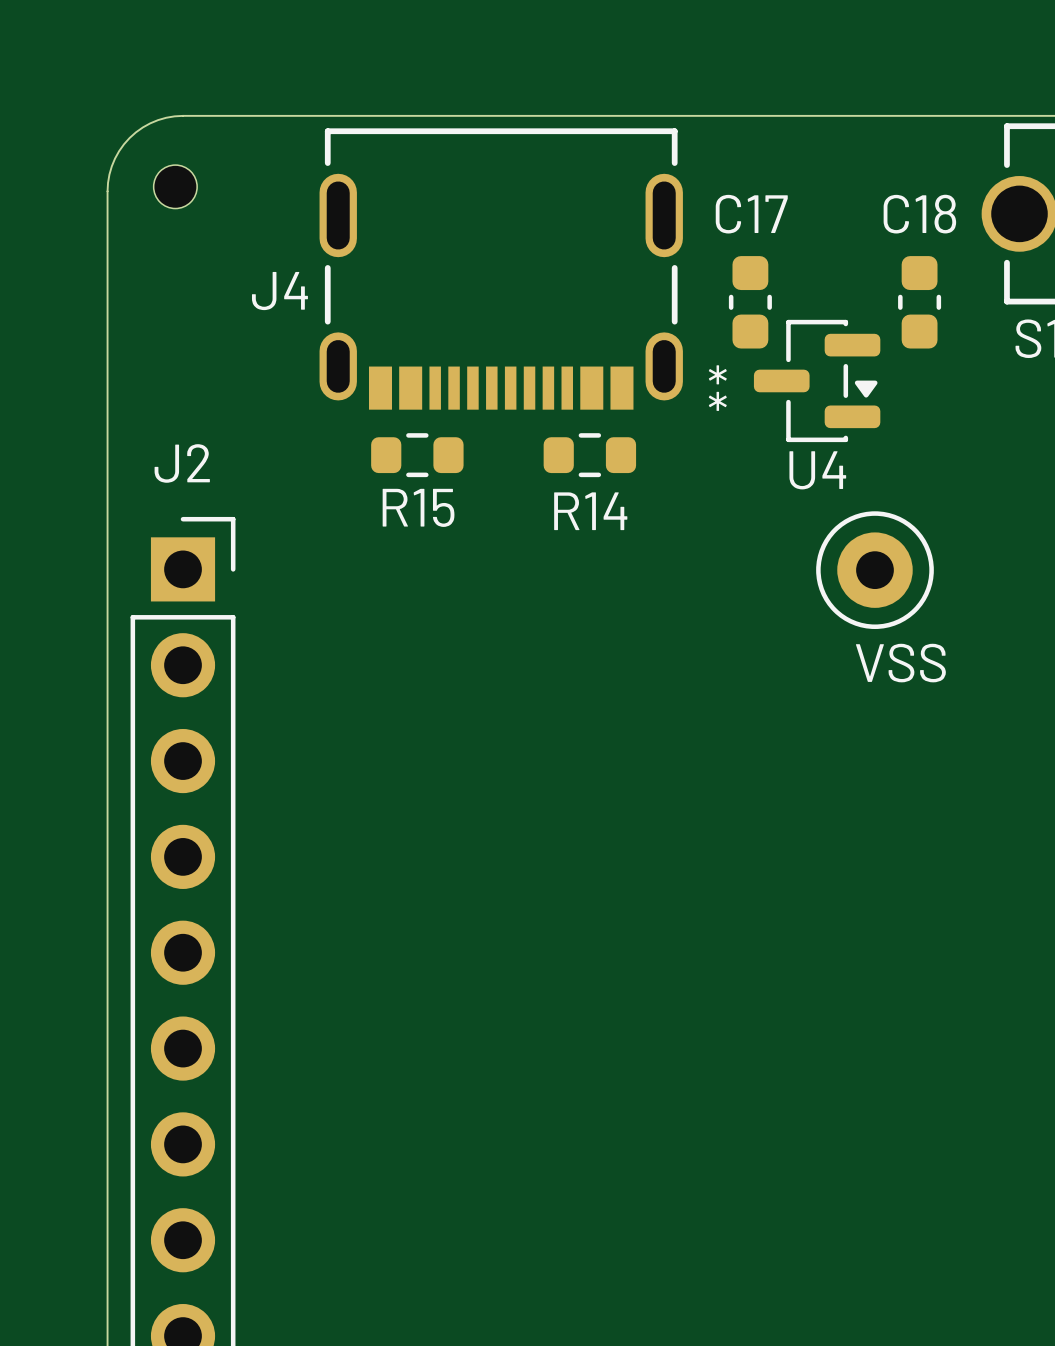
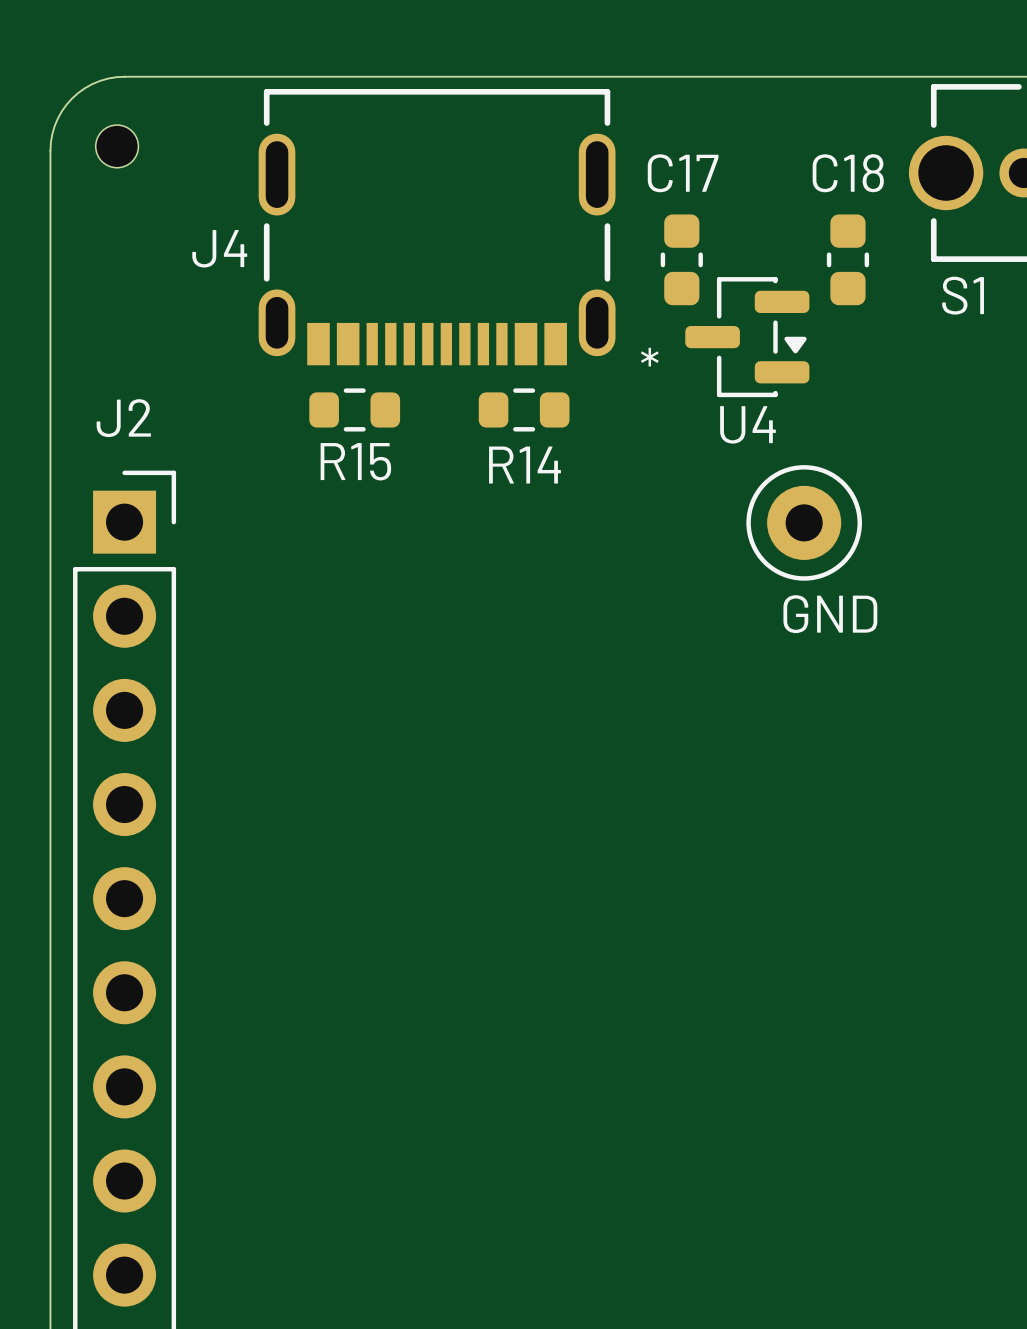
J4 footprint: [319, 128, 683, 410] -> [258, 88, 616, 366]
VSS name: VSS (900, 663) -> GND (830, 614)

